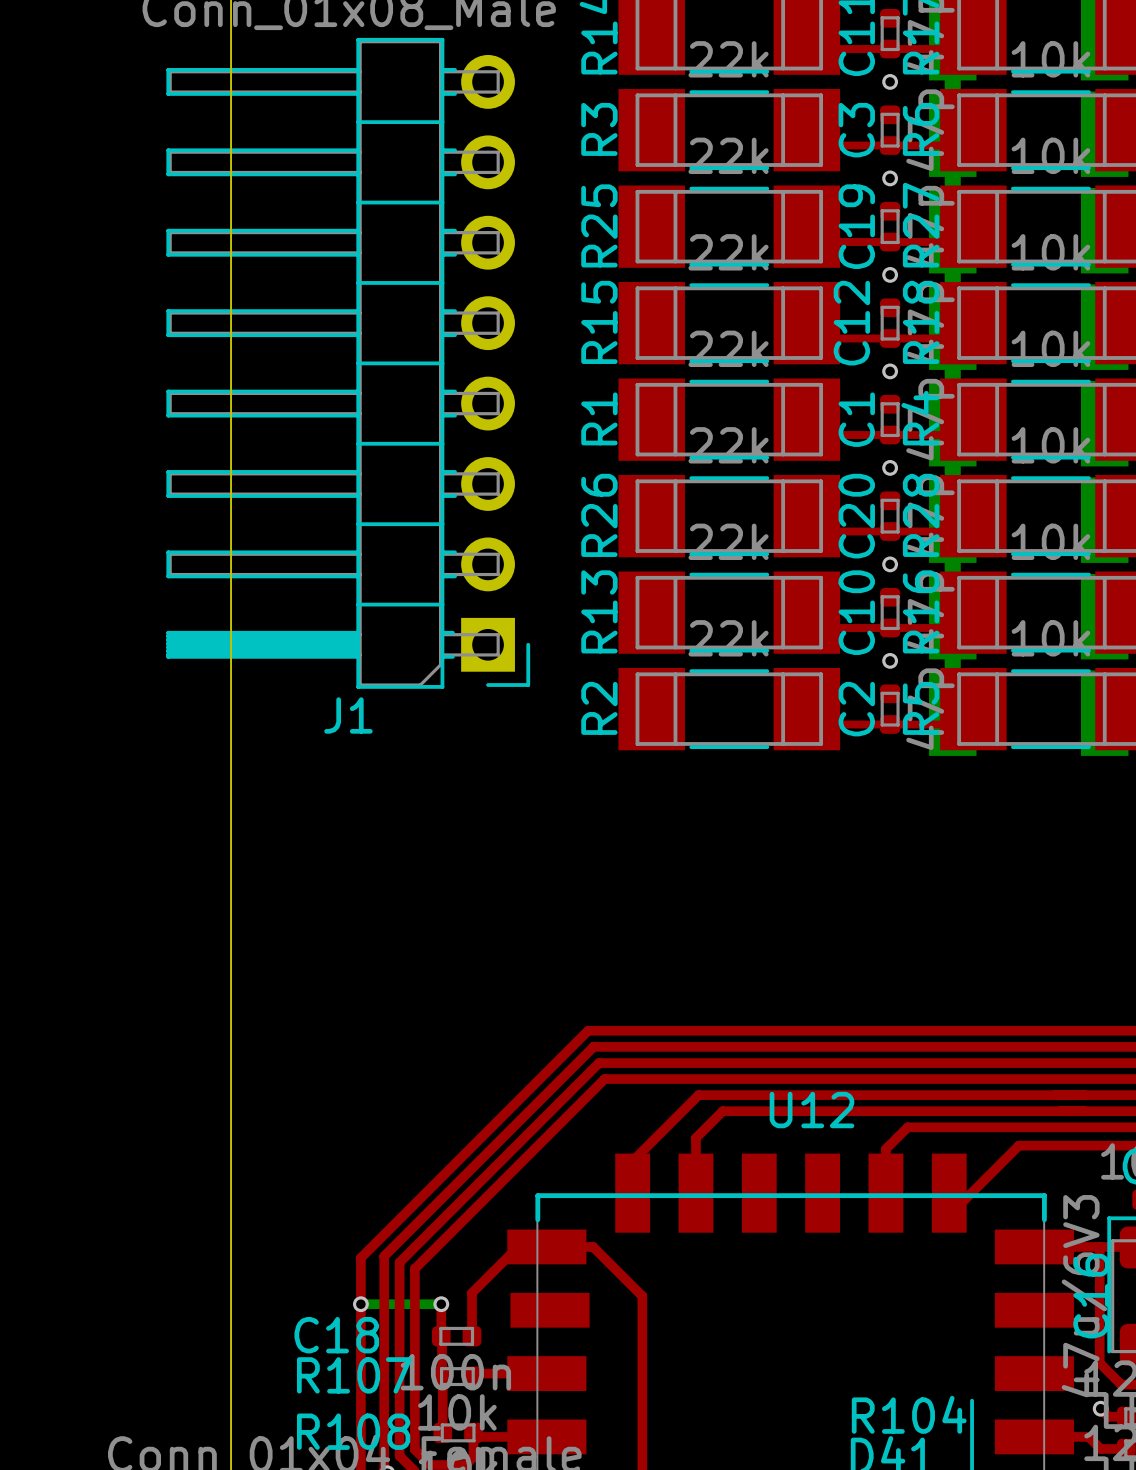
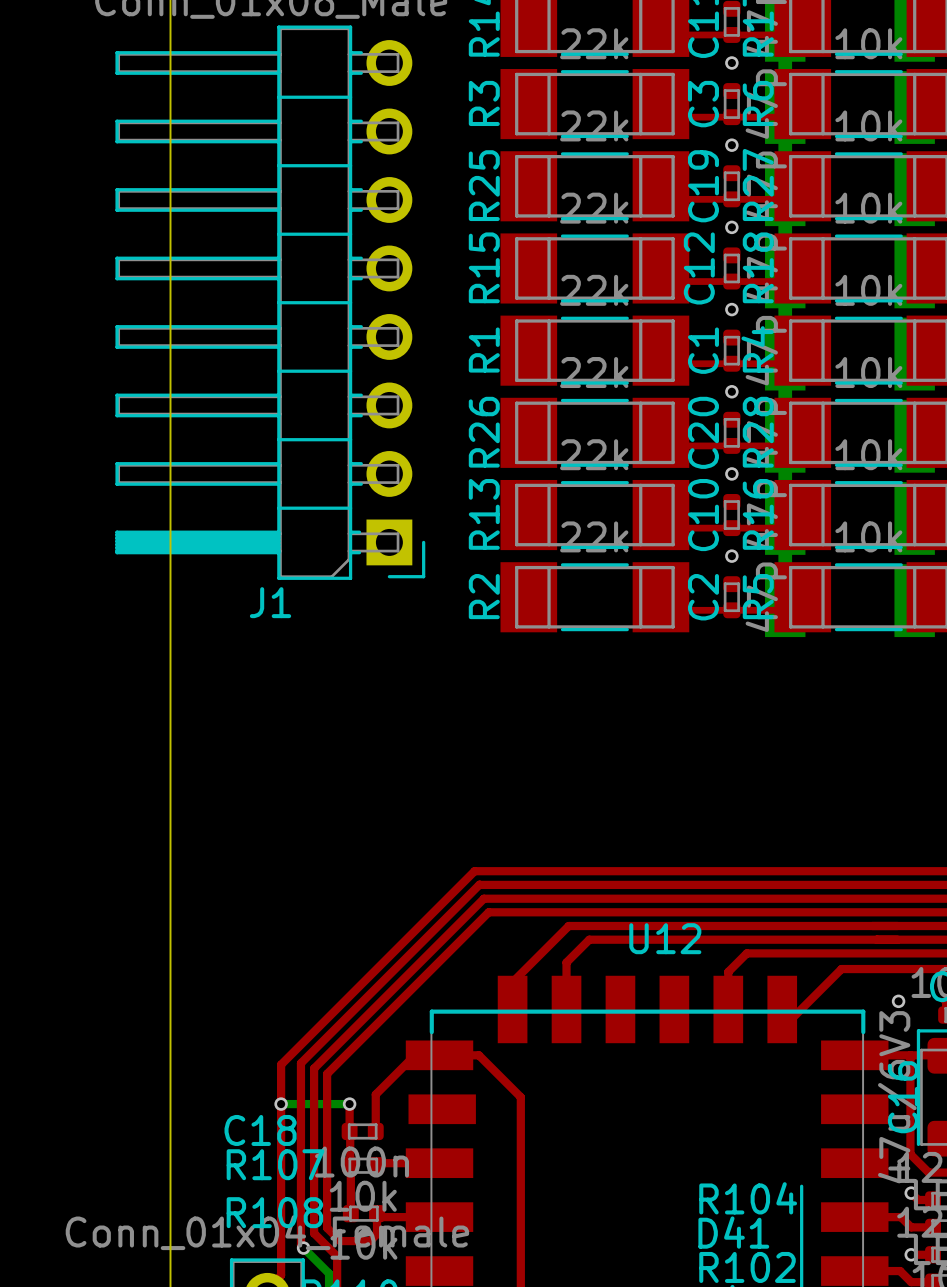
via: none -> (898, 1001)

